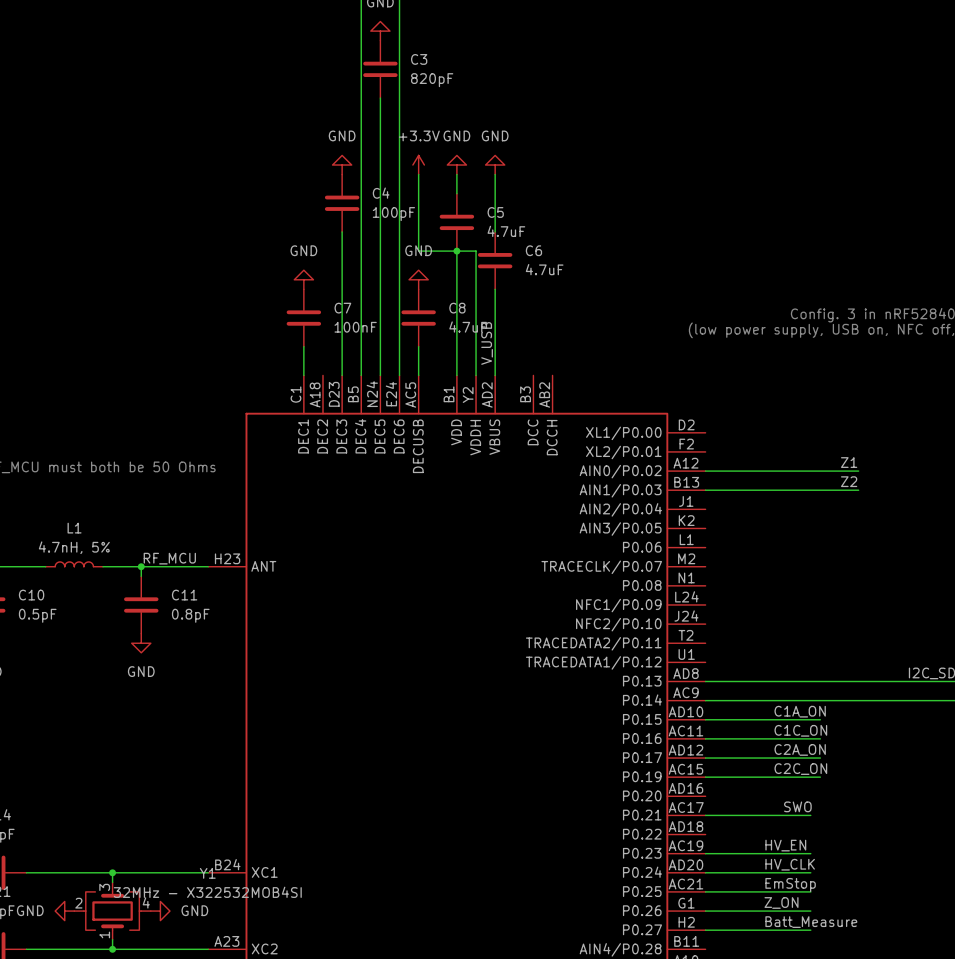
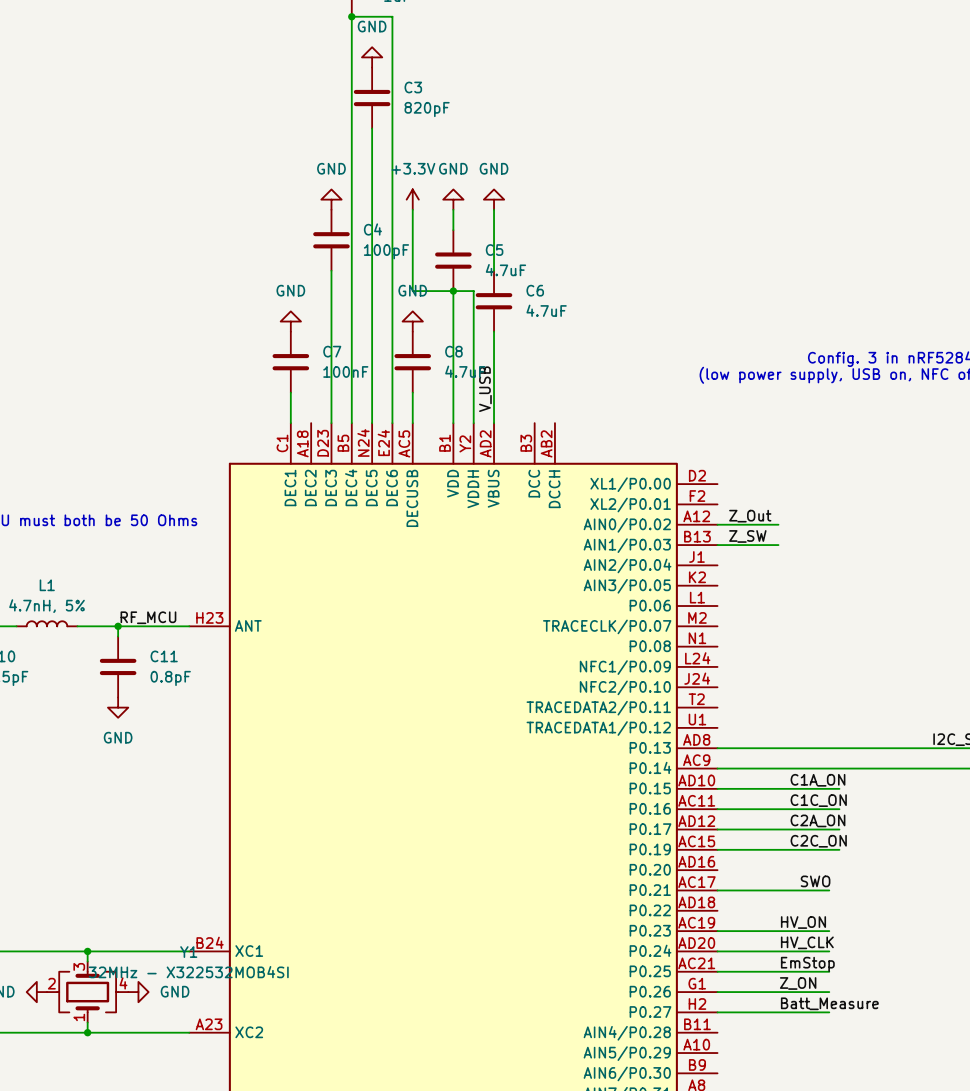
label: Z1 (849, 462) -> none
label: none -> Z_Out (750, 516)
wire: (762, 471) (858, 471) -> none
label: Z2 (849, 481) -> none
label: none -> Z_SW (747, 536)
wire: (762, 490) (858, 490) -> none
label: HV_EN (785, 845) -> HV_ON (803, 922)

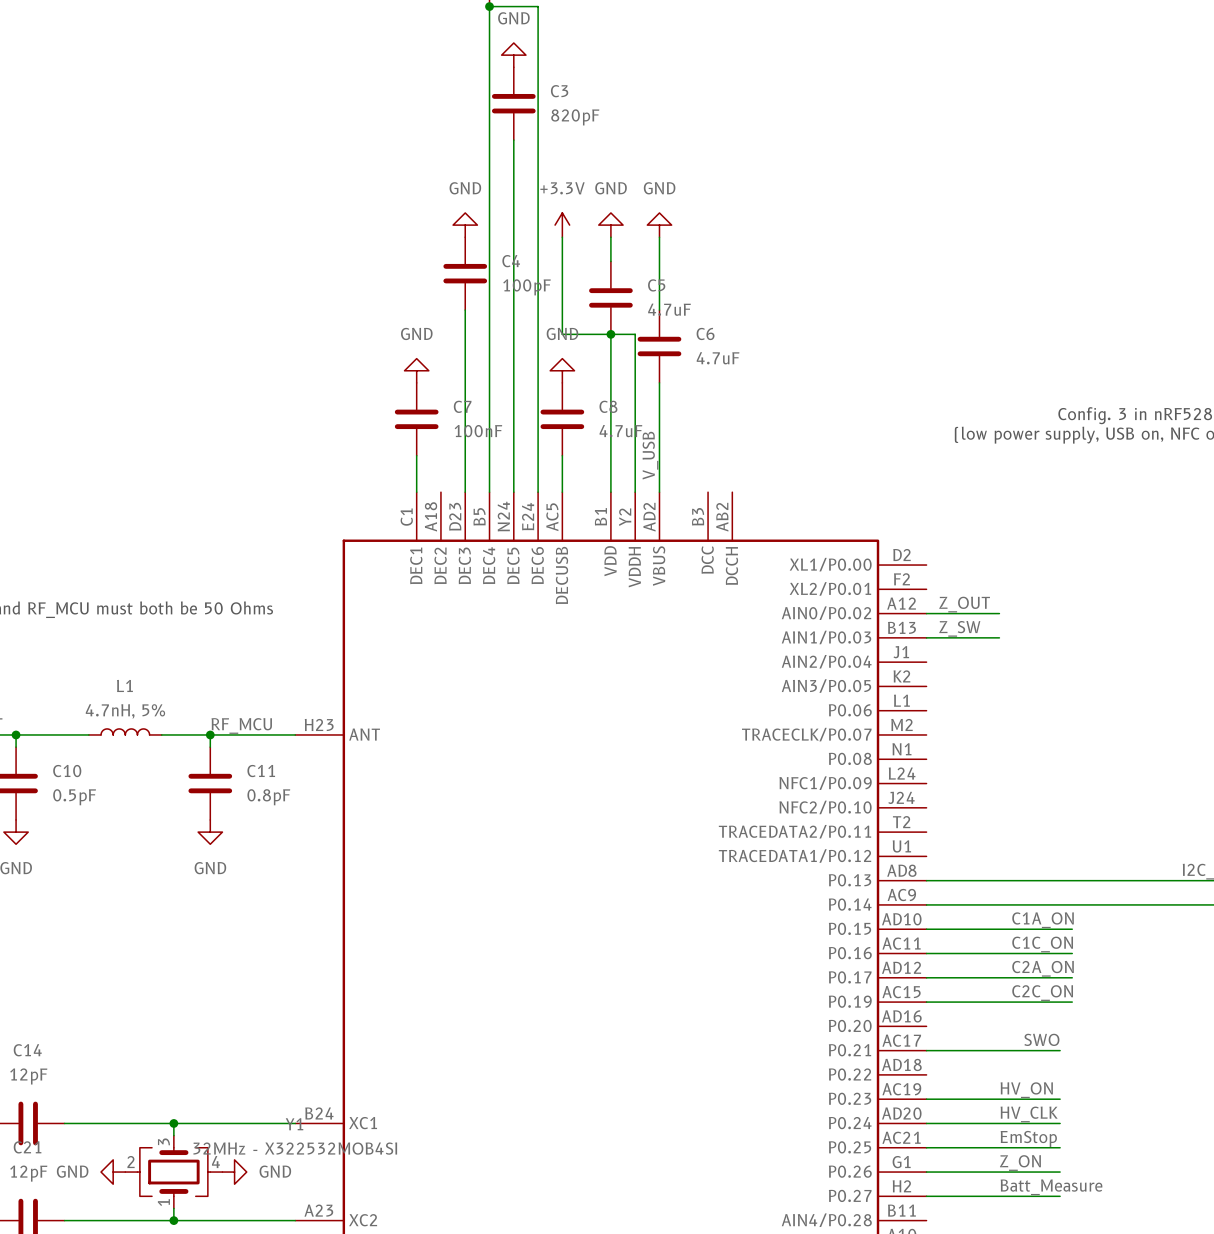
label: Z_Out (750, 516) -> Z_OUT (964, 604)

